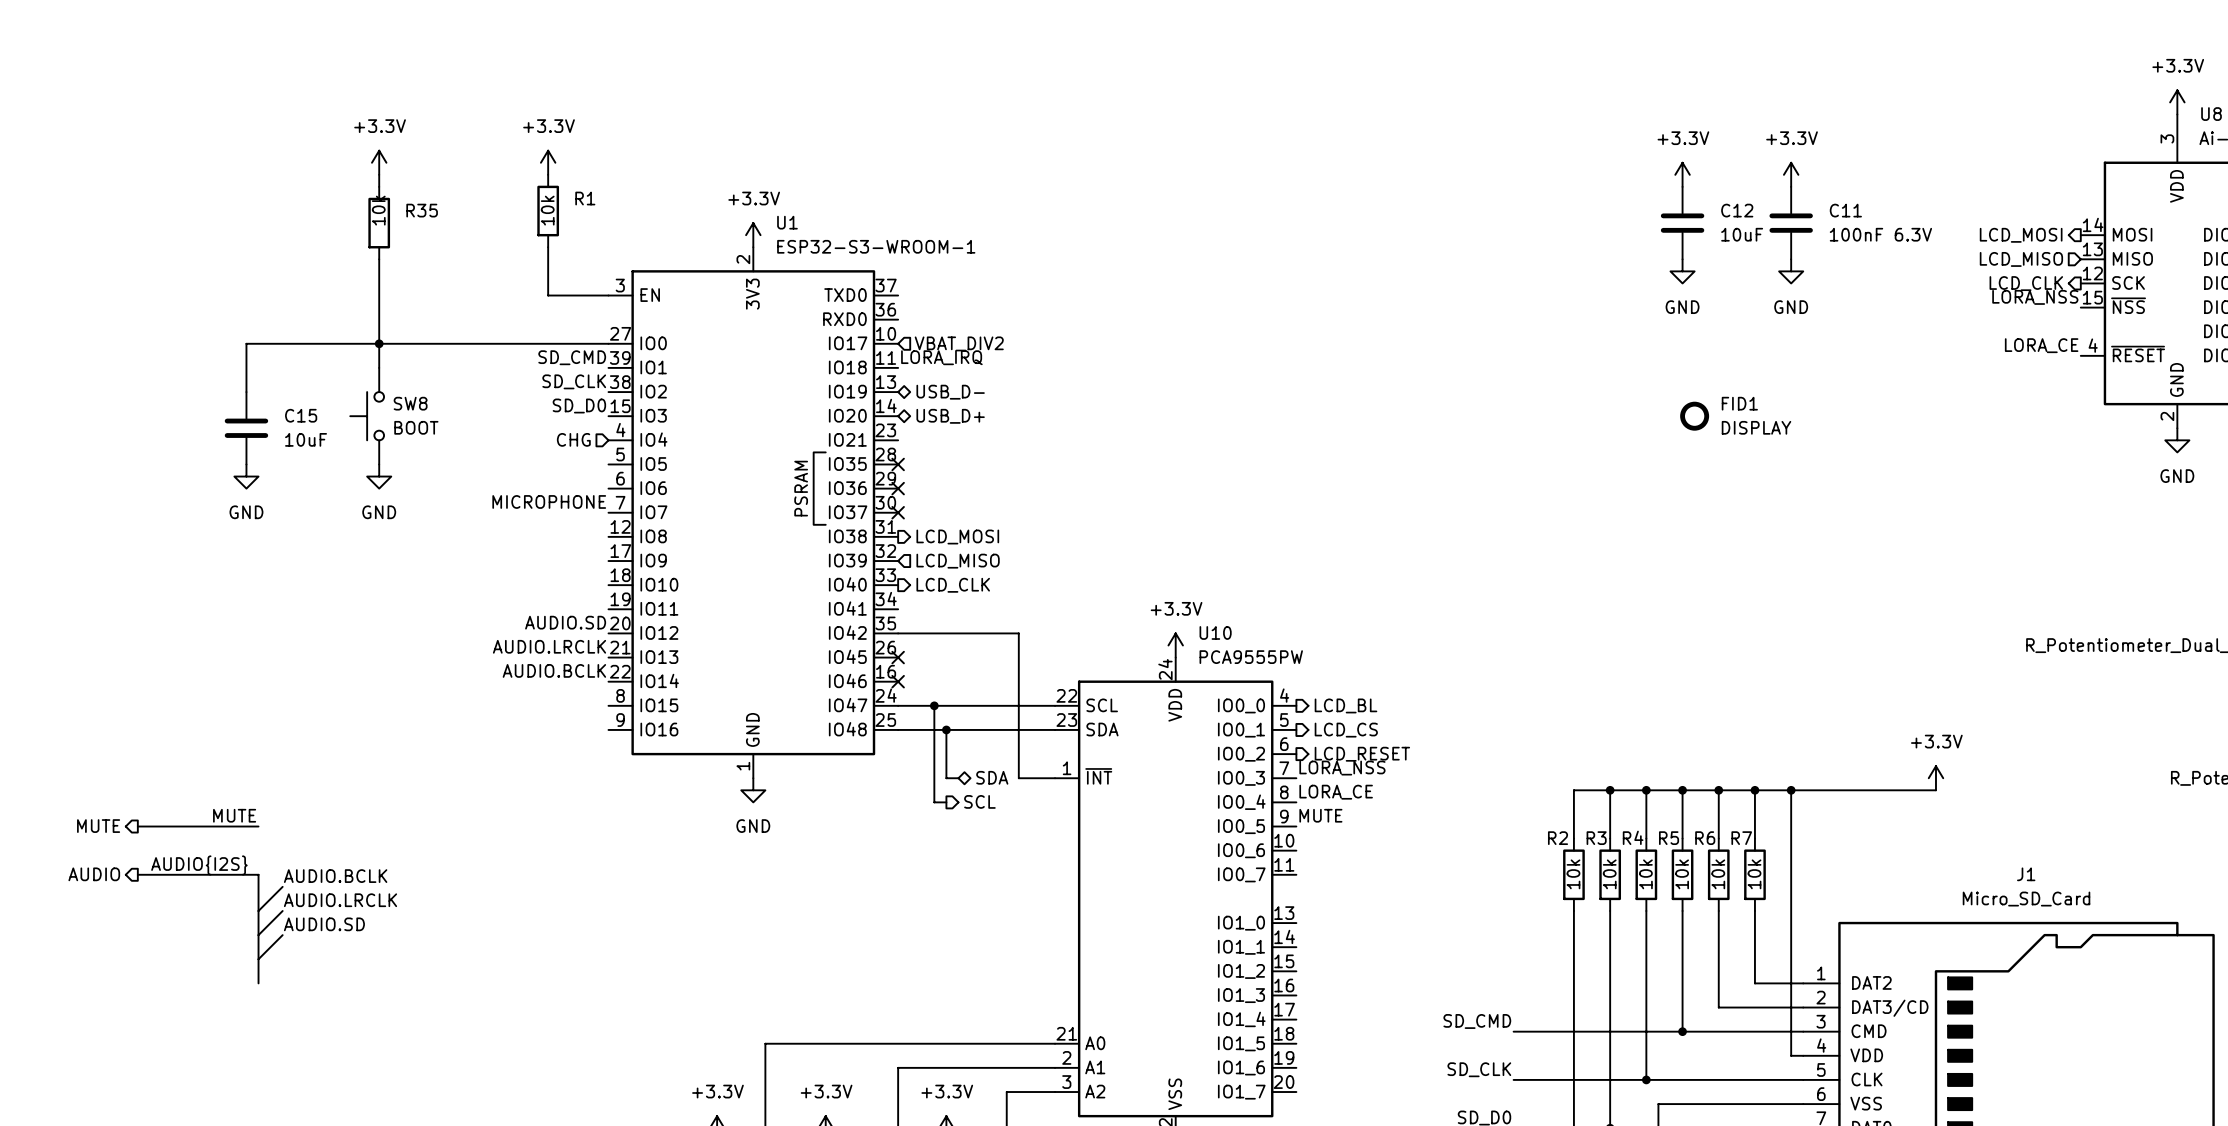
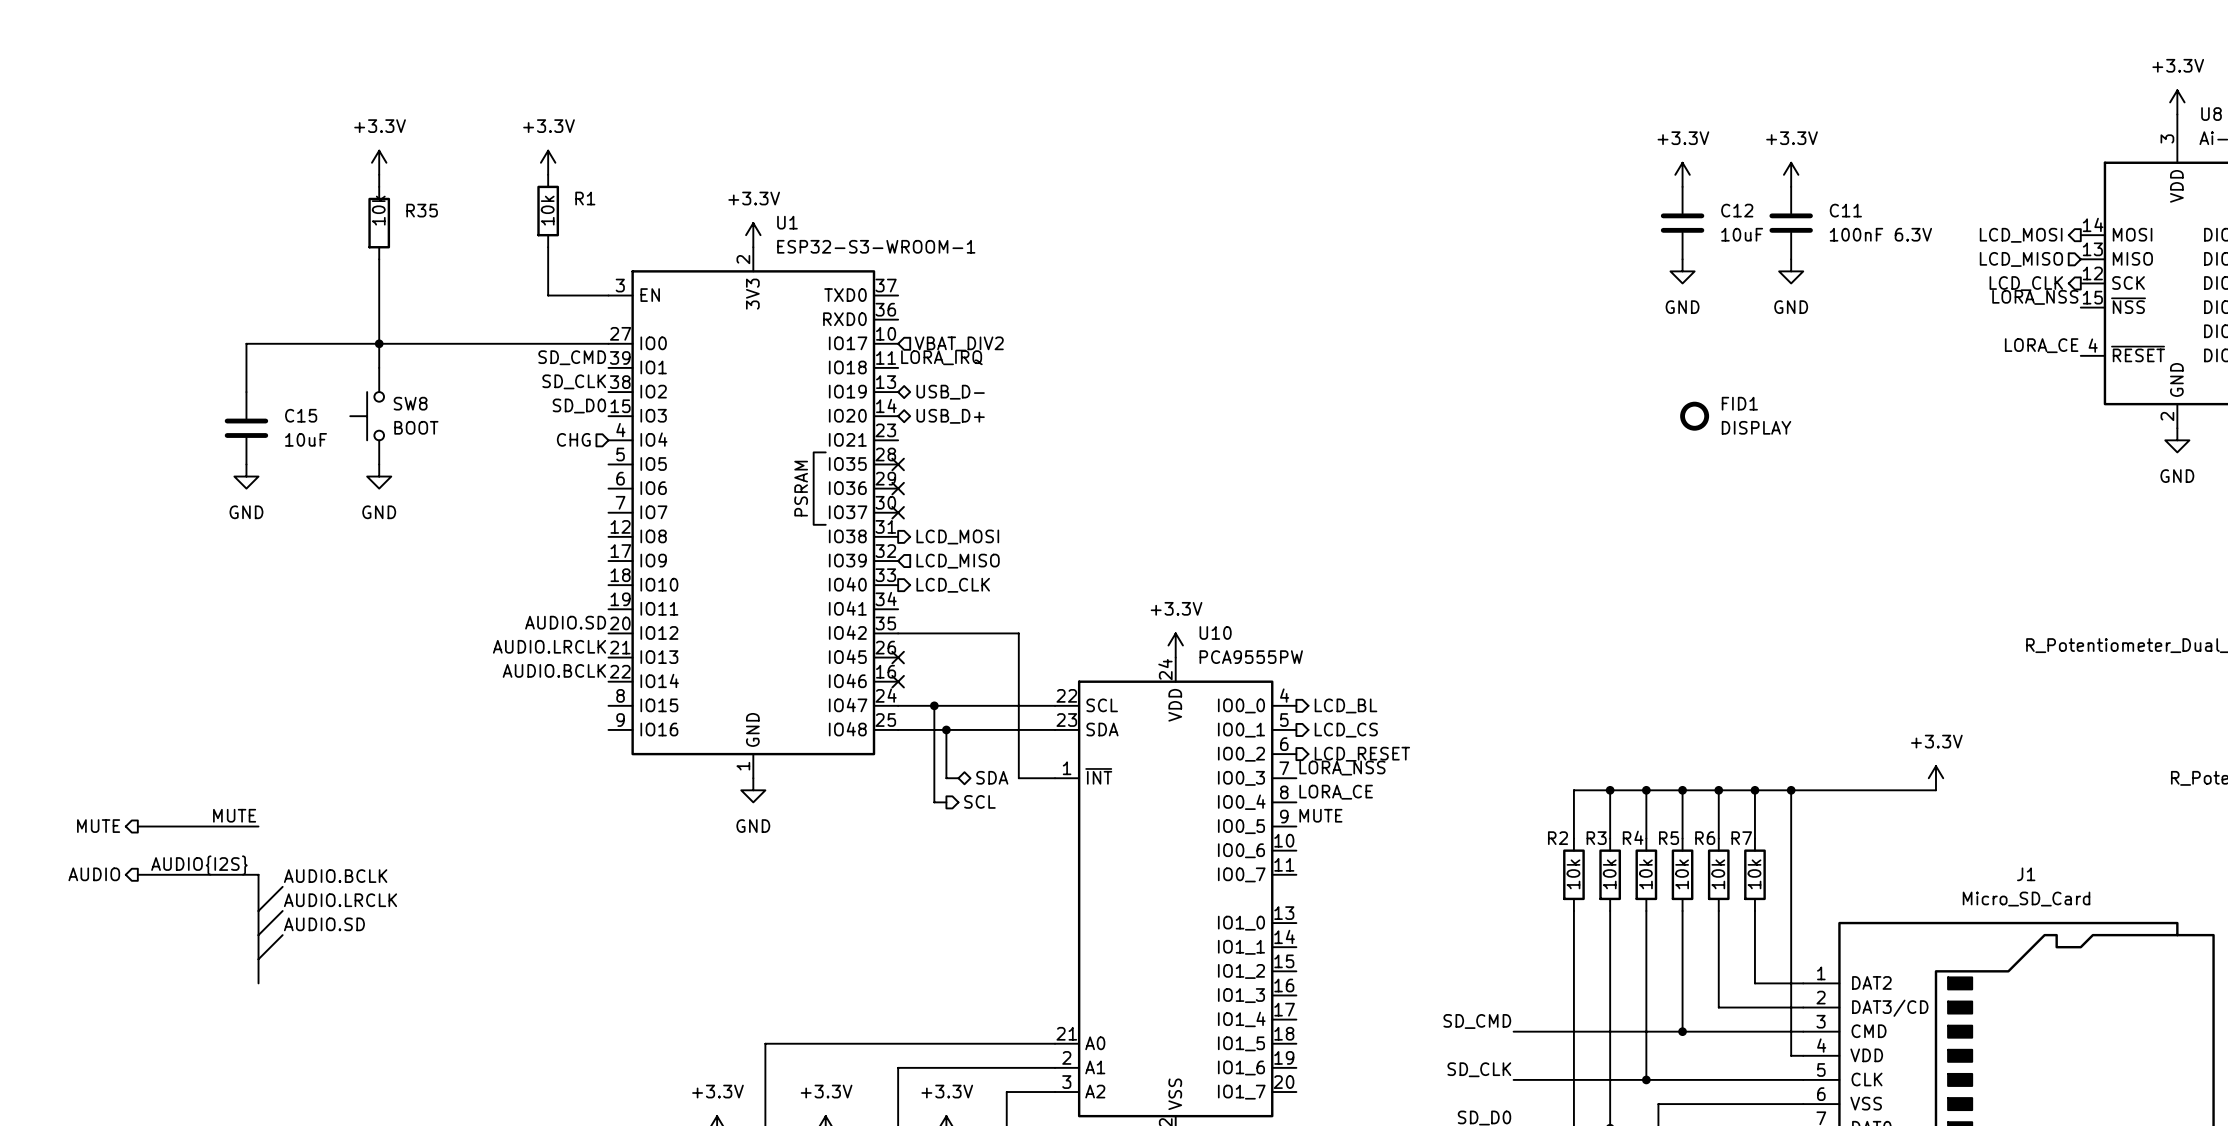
label: MICROPHONE (549, 501) -> none

